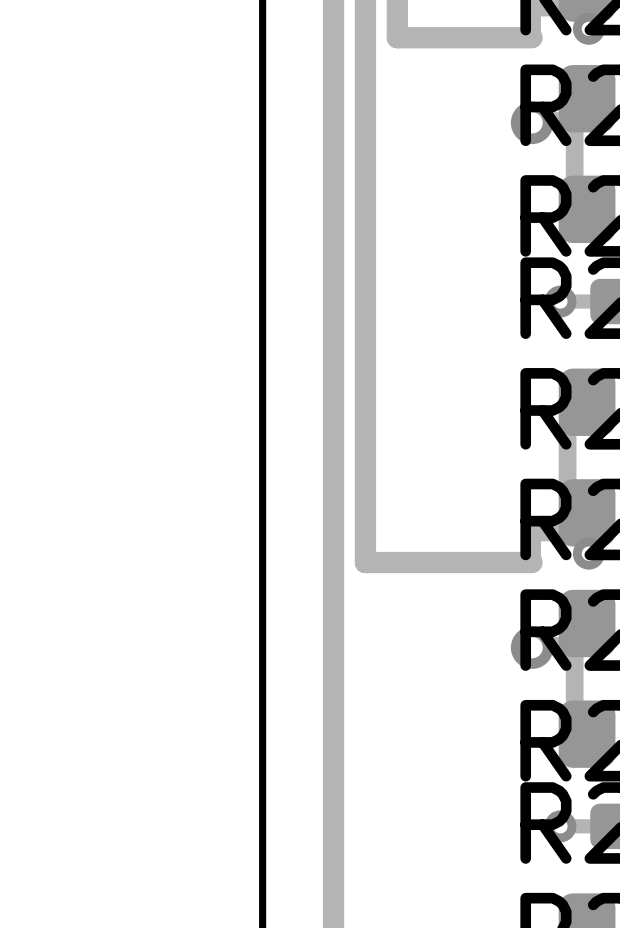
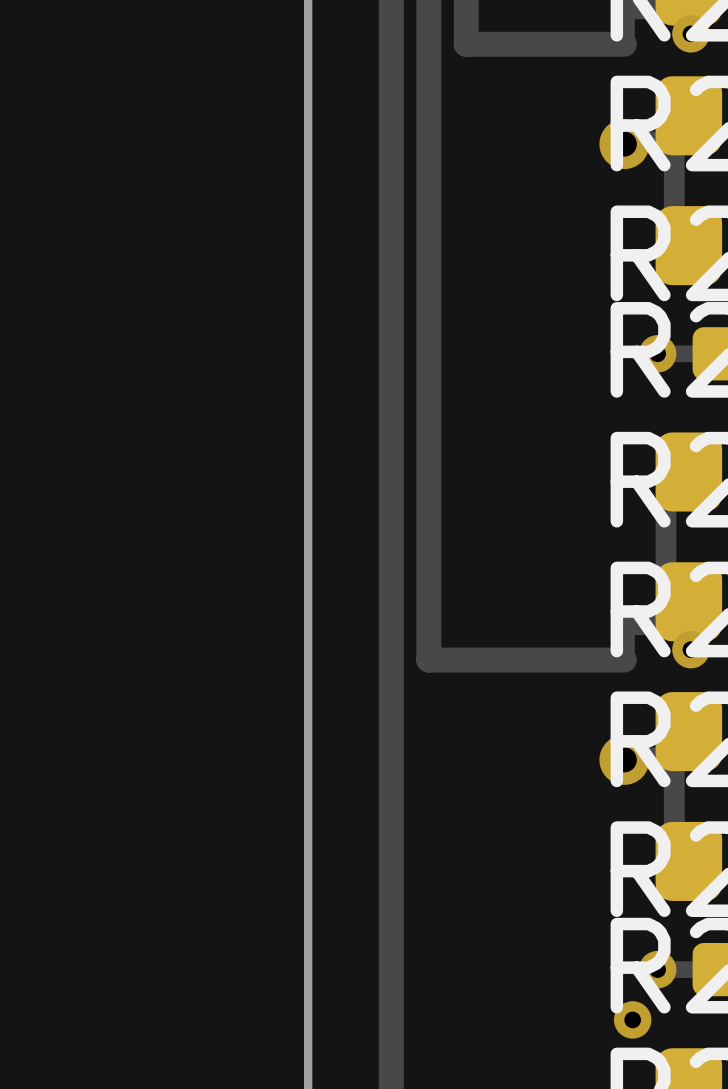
via: none -> (632, 1019)

